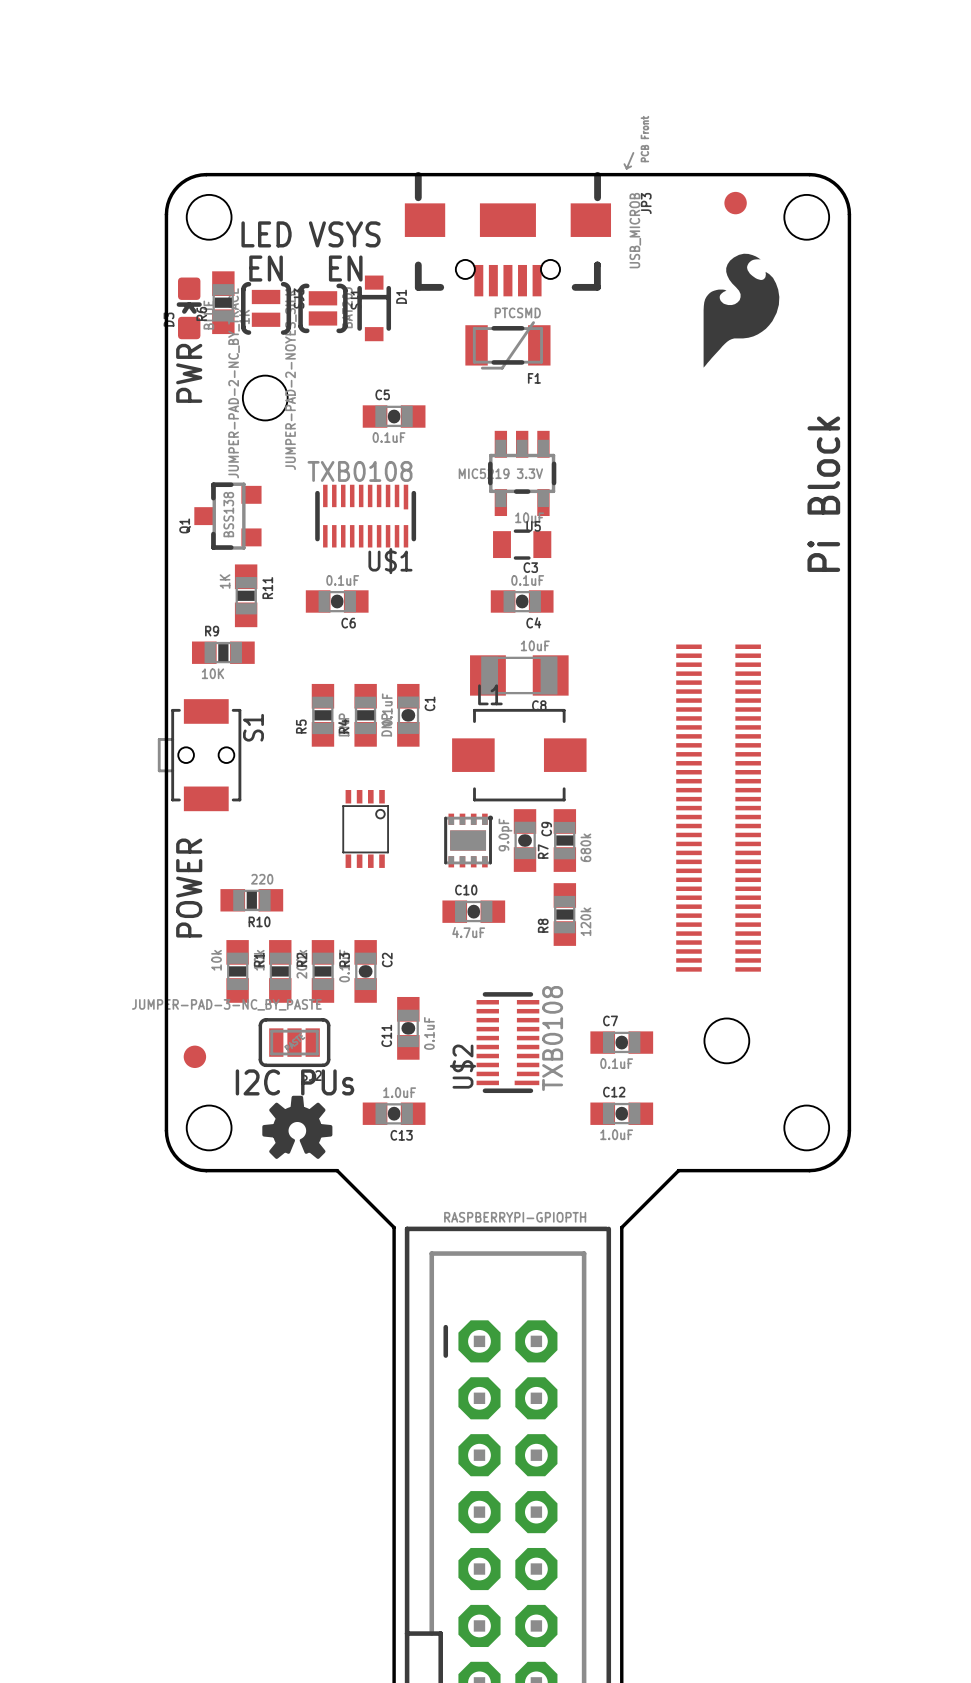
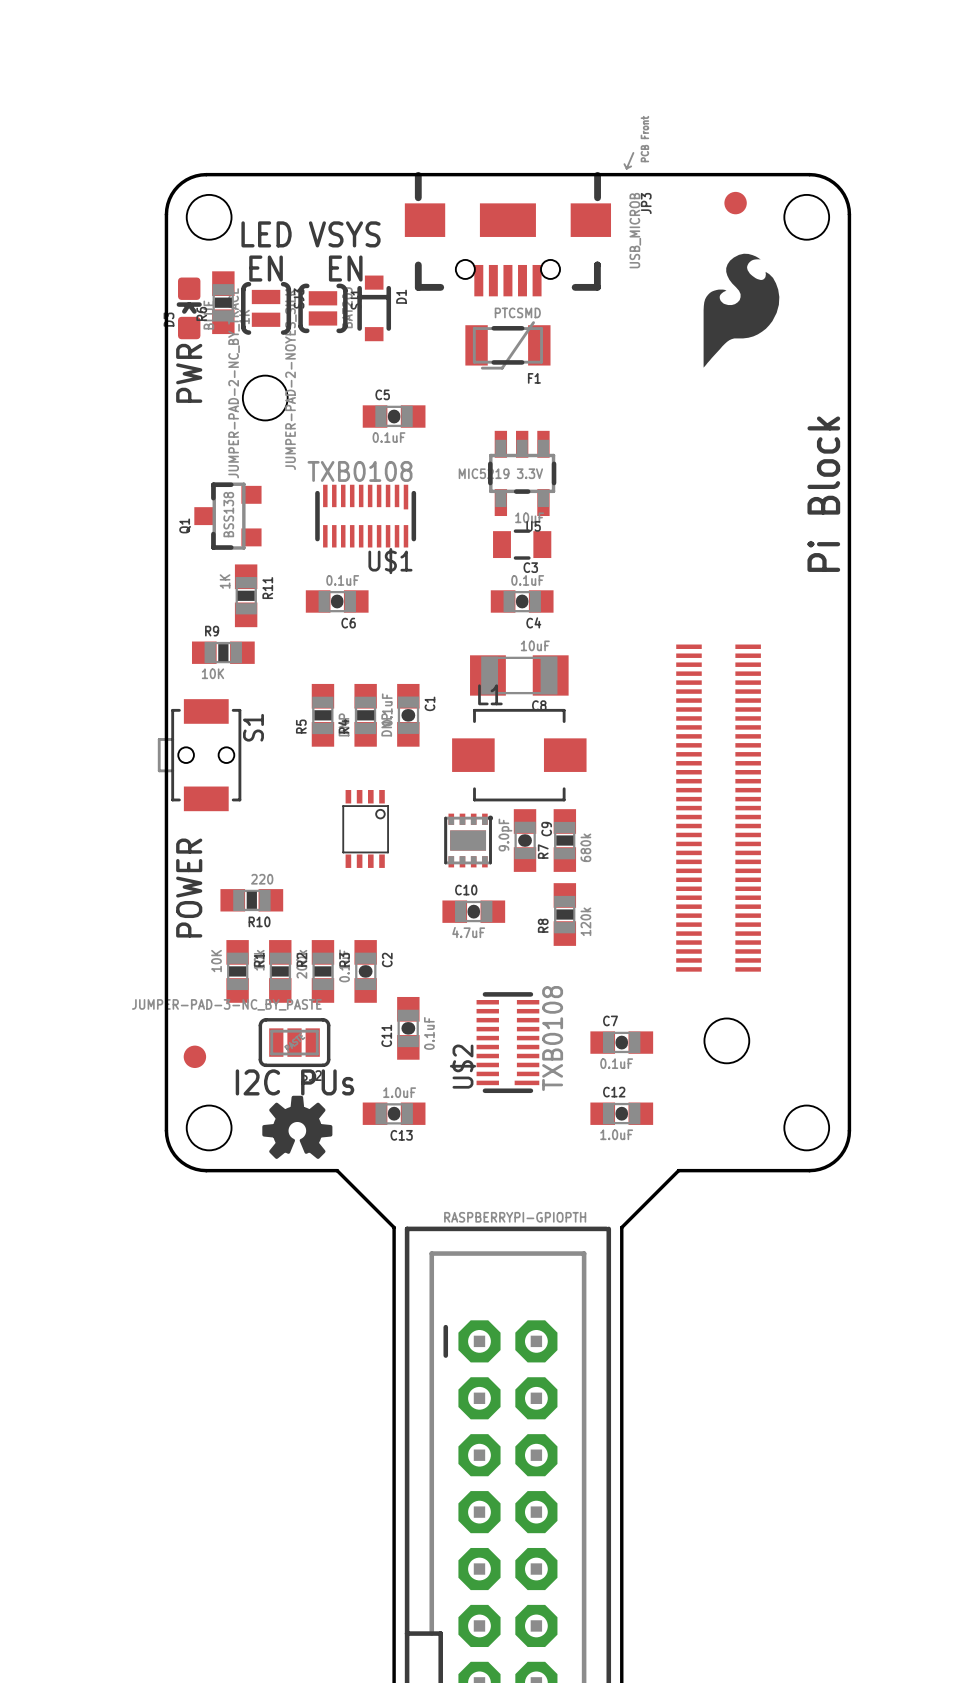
R1 value: 10k (216, 960) -> 10K (216, 961)

